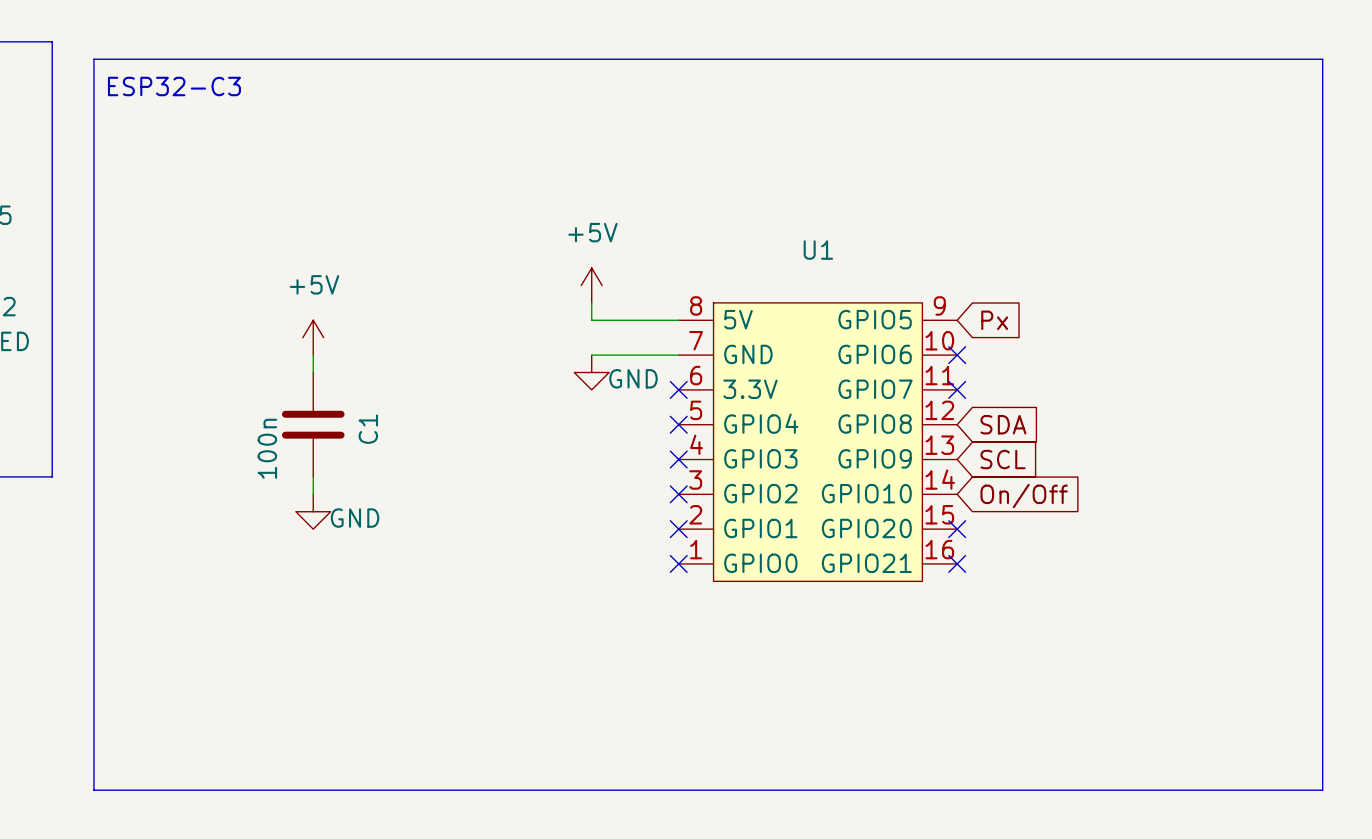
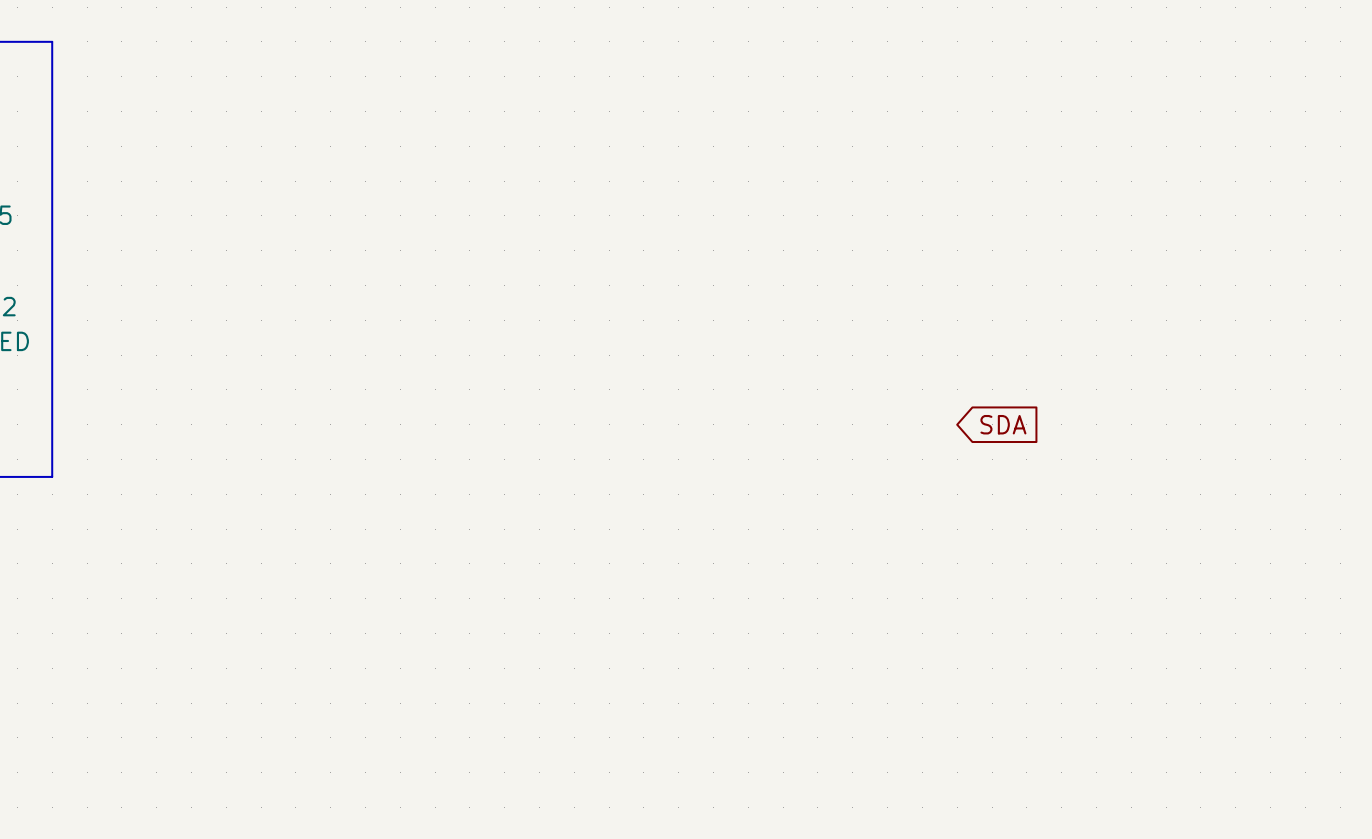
line: (93, 59) (1322, 59) (1322, 790) (93, 790) (93, 59) -> none
text: ESP32-C3 (174, 86) -> none
power symbol: +5V (591, 285) -> none
wire: (591, 302) (591, 320) (678, 320) -> none
global label: Px (994, 320) -> none
power symbol: +5V (313, 337) -> none
wire: (313, 355) (313, 372) -> none
wire: (591, 355) (678, 355) -> none
no-connect mark: (957, 355) -> none
power symbol: GND (591, 372) -> none
no-connect mark: (678, 389) -> none
no-connect mark: (957, 389) -> none
C1: 100n (313, 424) -> none
no-connect mark: (678, 424) -> none
U1: (817, 442) -> none
no-connect mark: (678, 459) -> none
global label: SCL (1003, 459) -> none
wire: (313, 476) (313, 494) -> none
no-connect mark: (678, 494) -> none
global label: On/Off (1024, 495) -> none
power symbol: GND (313, 511) -> none
no-connect mark: (678, 529) -> none
no-connect mark: (957, 529) -> none
no-connect mark: (678, 563) -> none
no-connect mark: (957, 563) -> none

